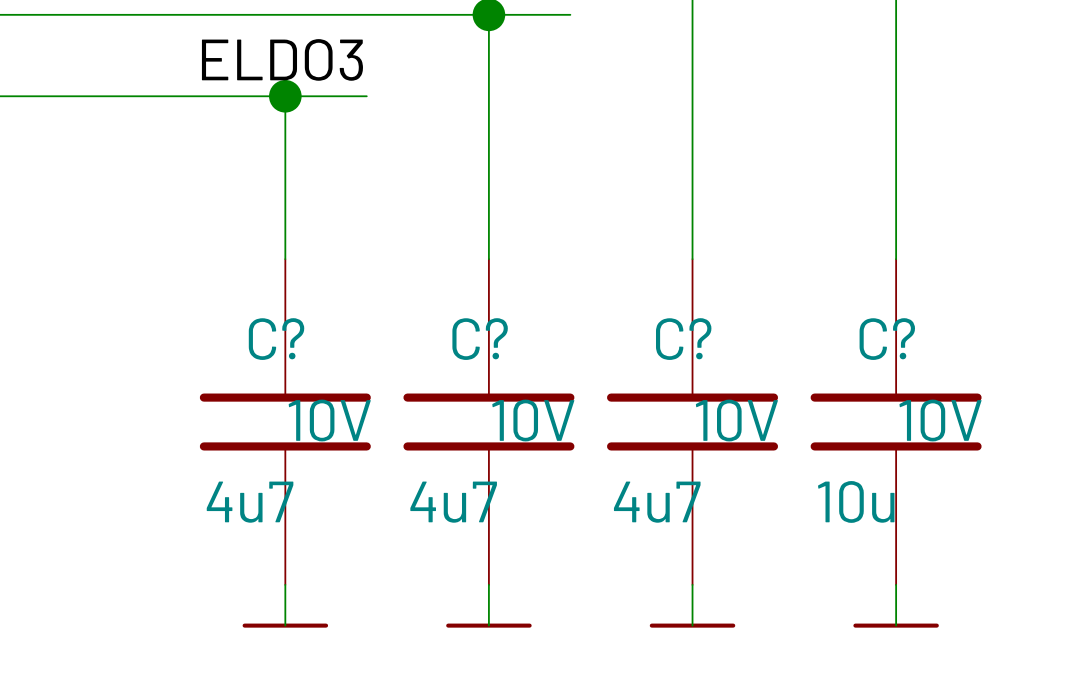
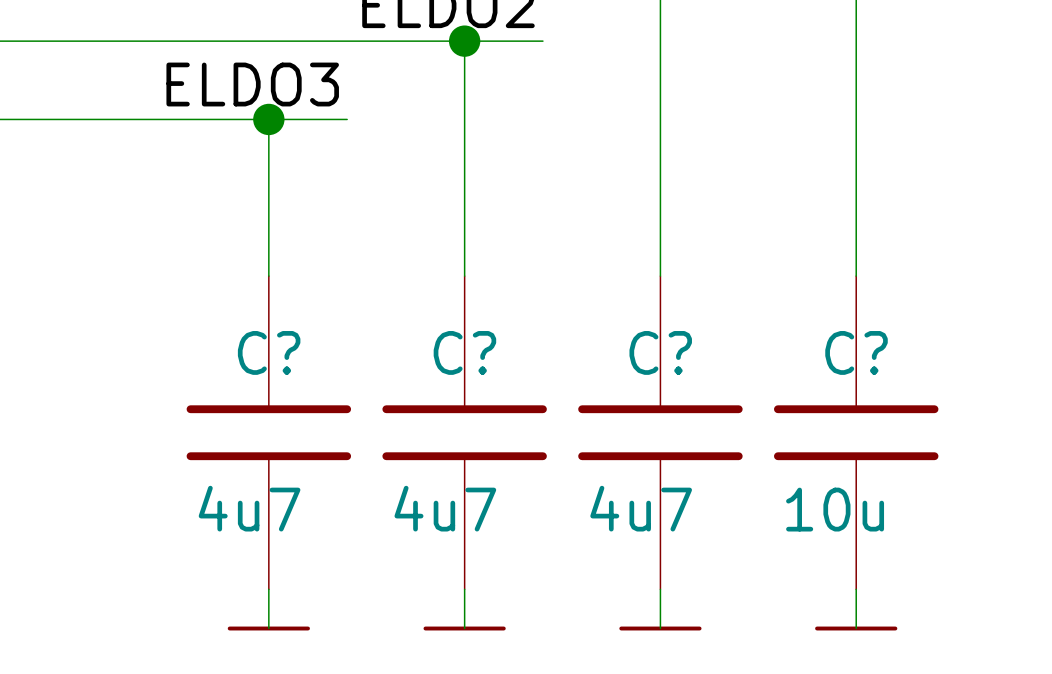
C? text: 10V (329, 420) -> none
C? text: 10V (533, 420) -> none
C? text: 10V (736, 420) -> none
C? text: 10V (940, 420) -> none

